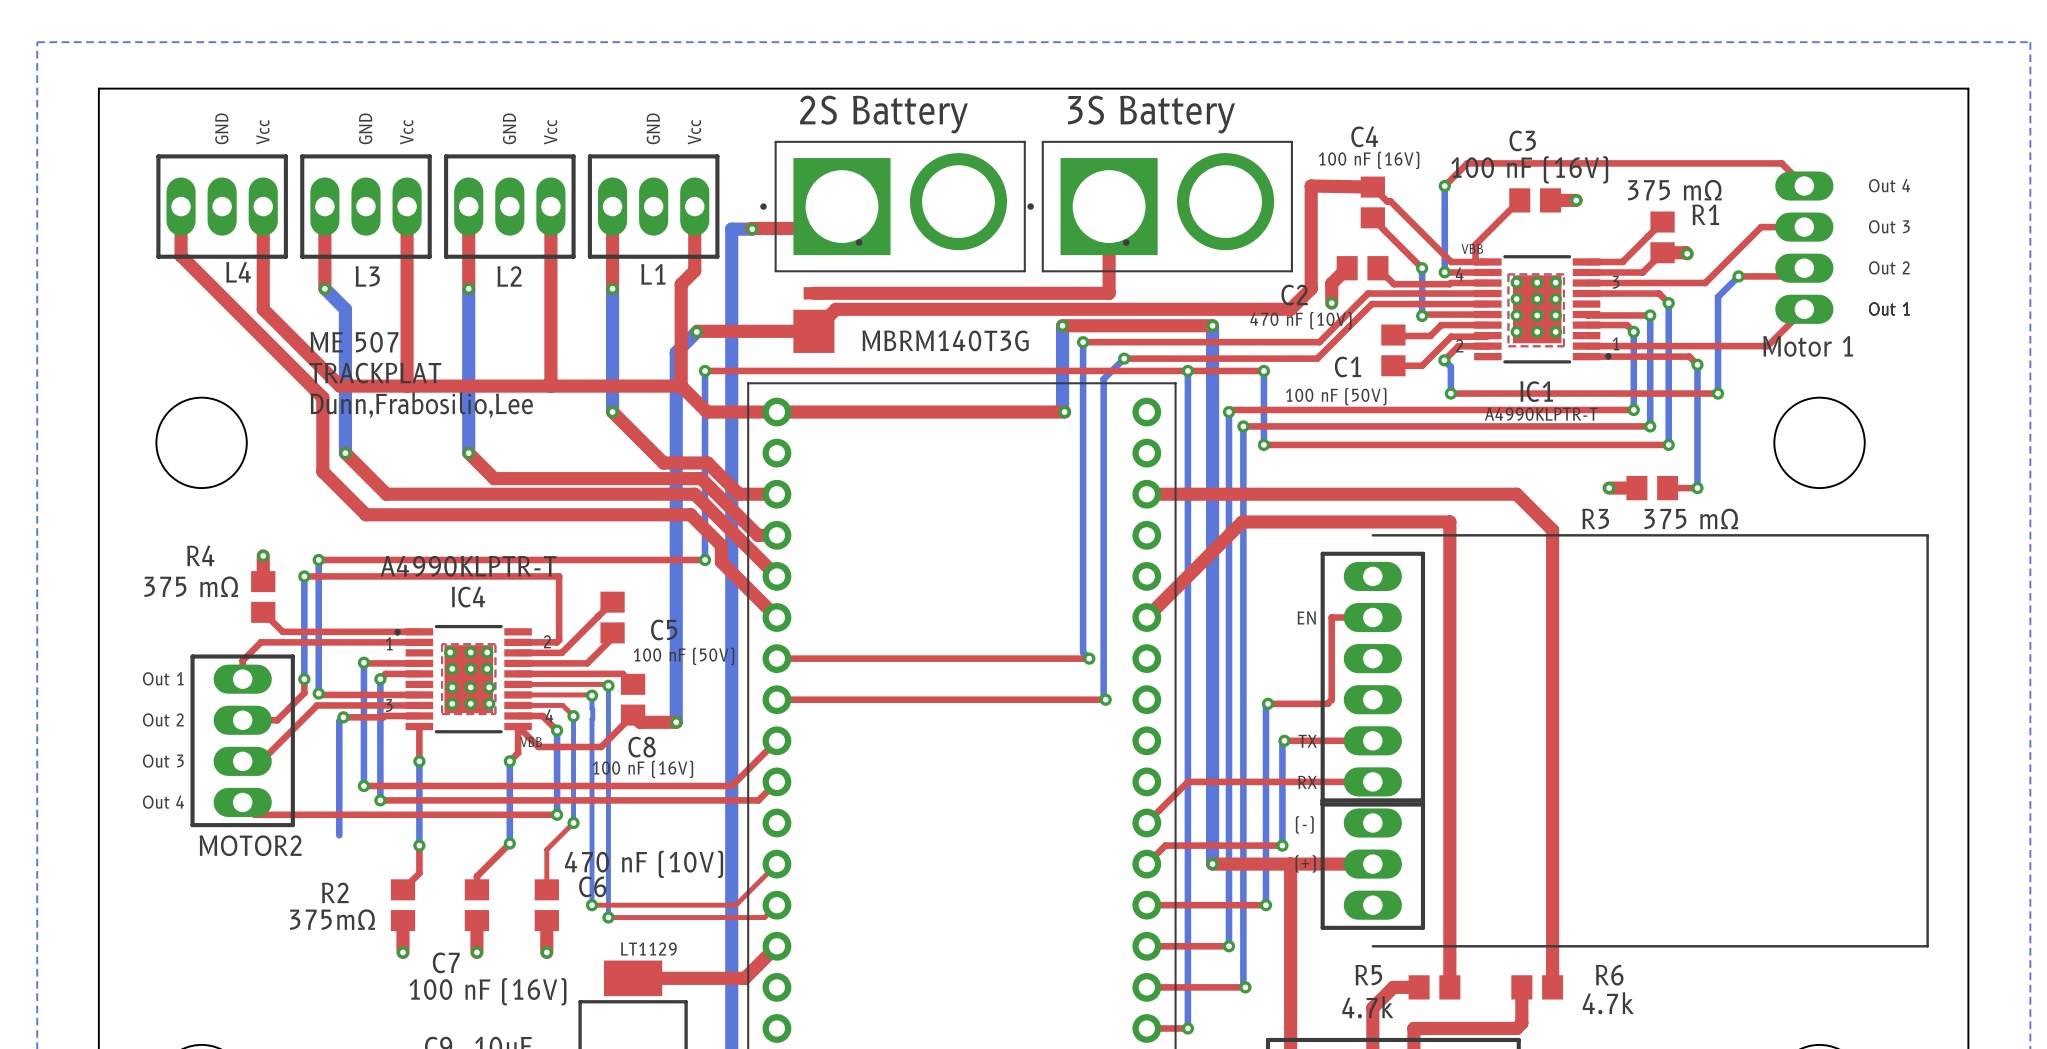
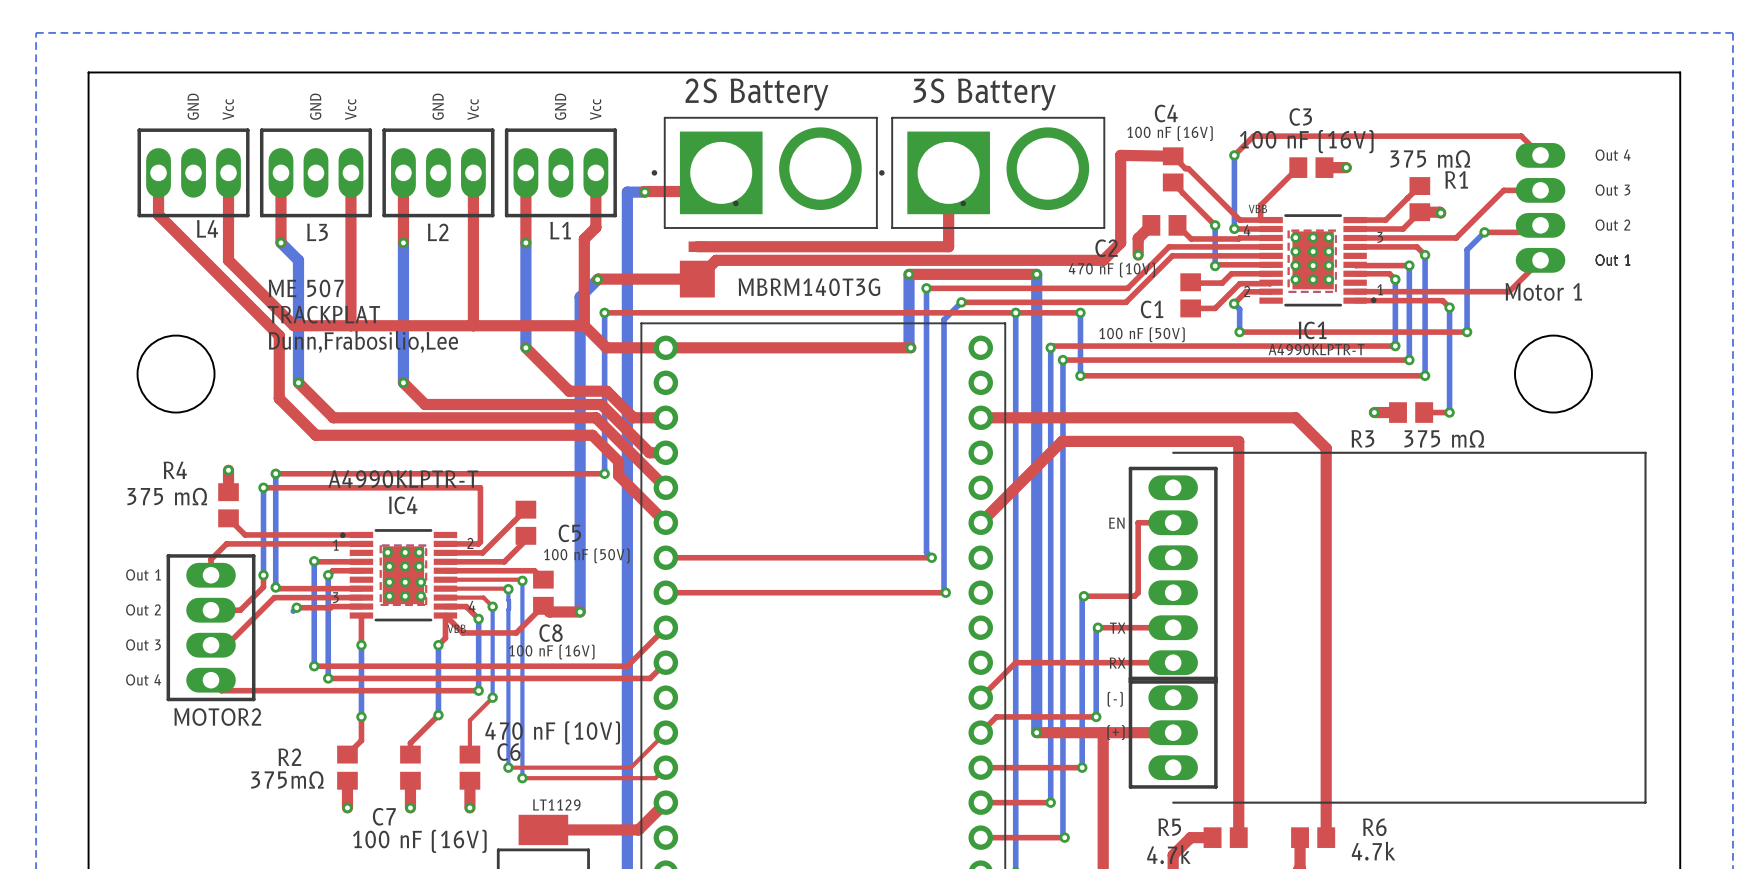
bottom track: (339, 721) (339, 835) -> none

